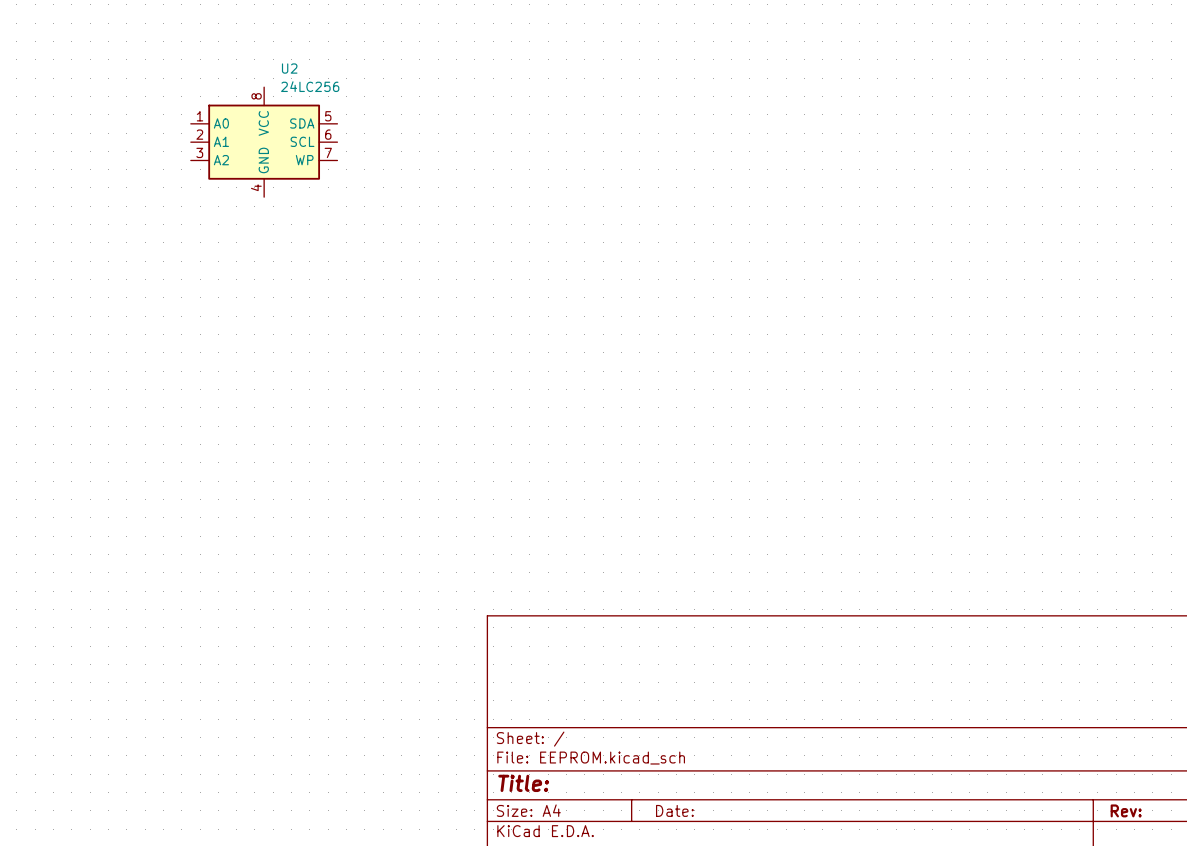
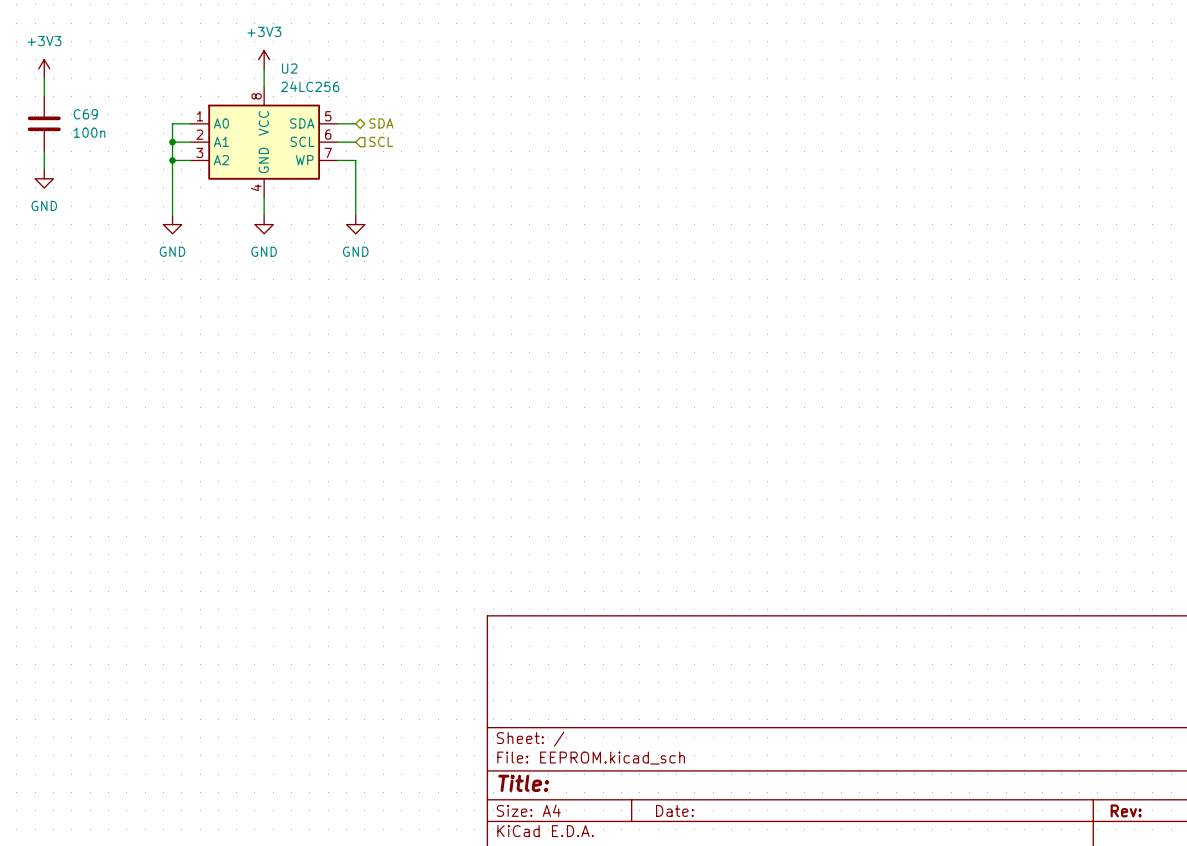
power symbol: none -> +3V3 (264, 59)
power symbol: none -> +3V3 (44, 68)
wire: none -> (264, 68) (264, 87)
wire: none -> (44, 78) (44, 96)
C69: none -> 100n (44, 123)
wire: none -> (190, 123) (172, 123) (172, 215)
wire: none -> (337, 123) (355, 123)
hierarchical label: none -> SDA (381, 123)
hierarchical label: none -> SCL (381, 141)
wire: none -> (172, 142) (190, 142)
junction: none -> (172, 142)
wire: none -> (337, 142) (355, 142)
wire: none -> (44, 151) (44, 169)
wire: none -> (172, 160) (190, 160)
junction: none -> (172, 160)
wire: none -> (337, 160) (355, 160) (355, 215)
power symbol: none -> GND (44, 178)
wire: none -> (264, 197) (264, 215)
power symbol: none -> GND (172, 224)
power symbol: none -> GND (264, 224)
power symbol: none -> GND (355, 224)

